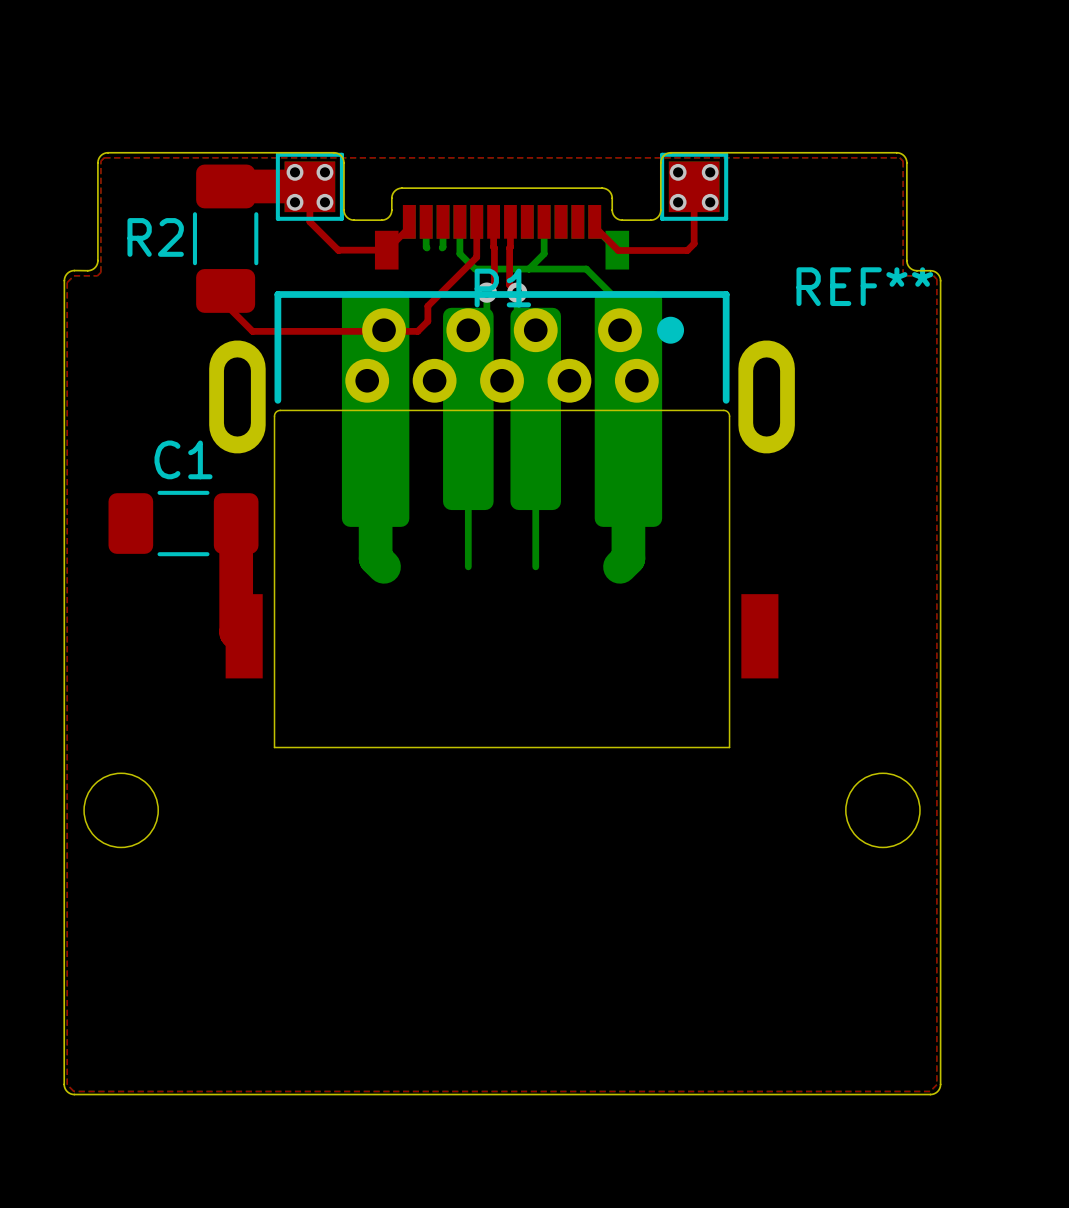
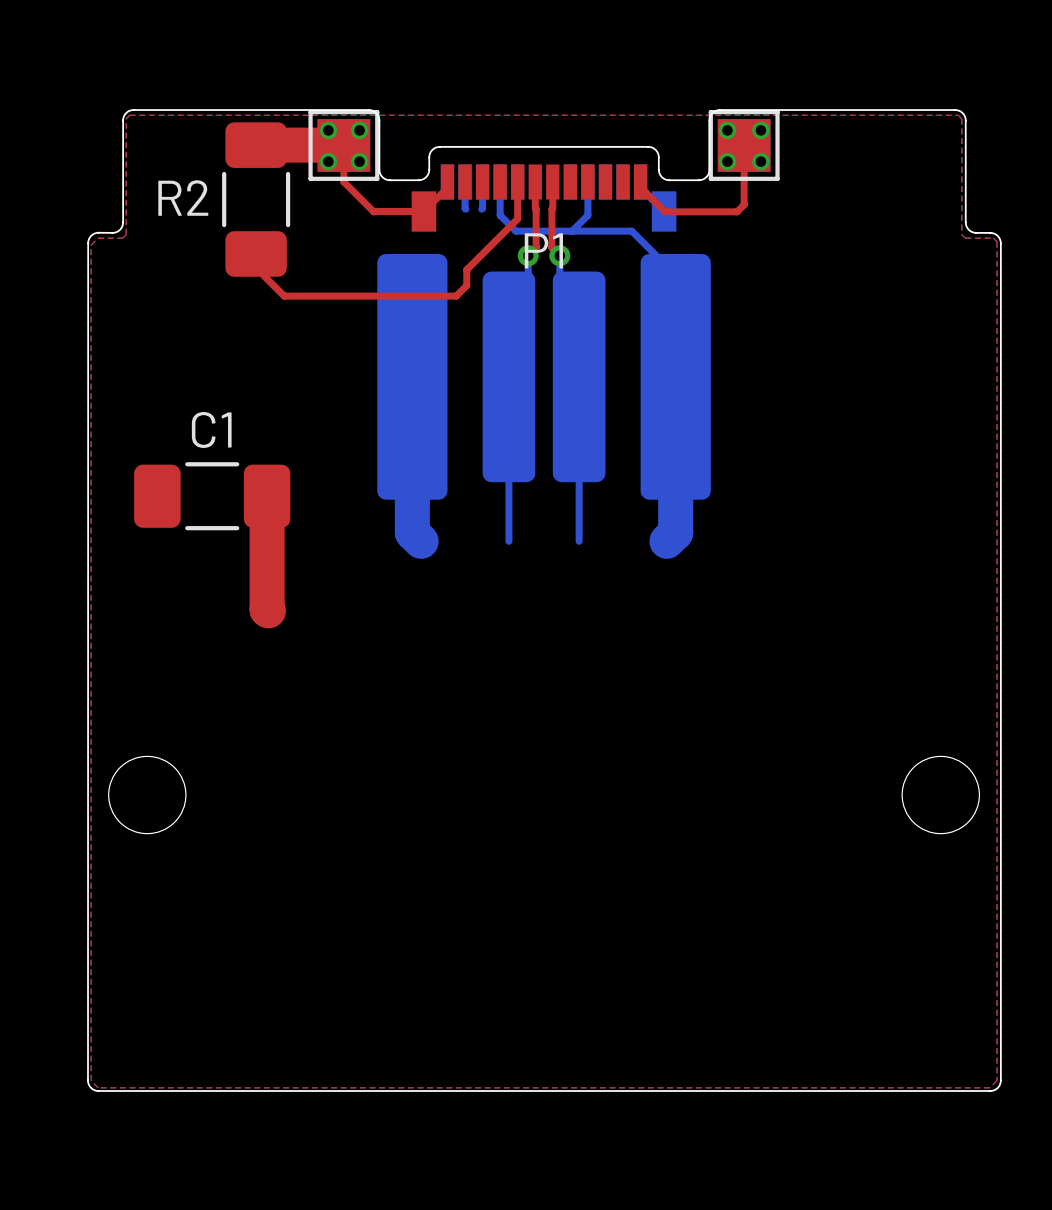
REF**: (502, 519) -> none

